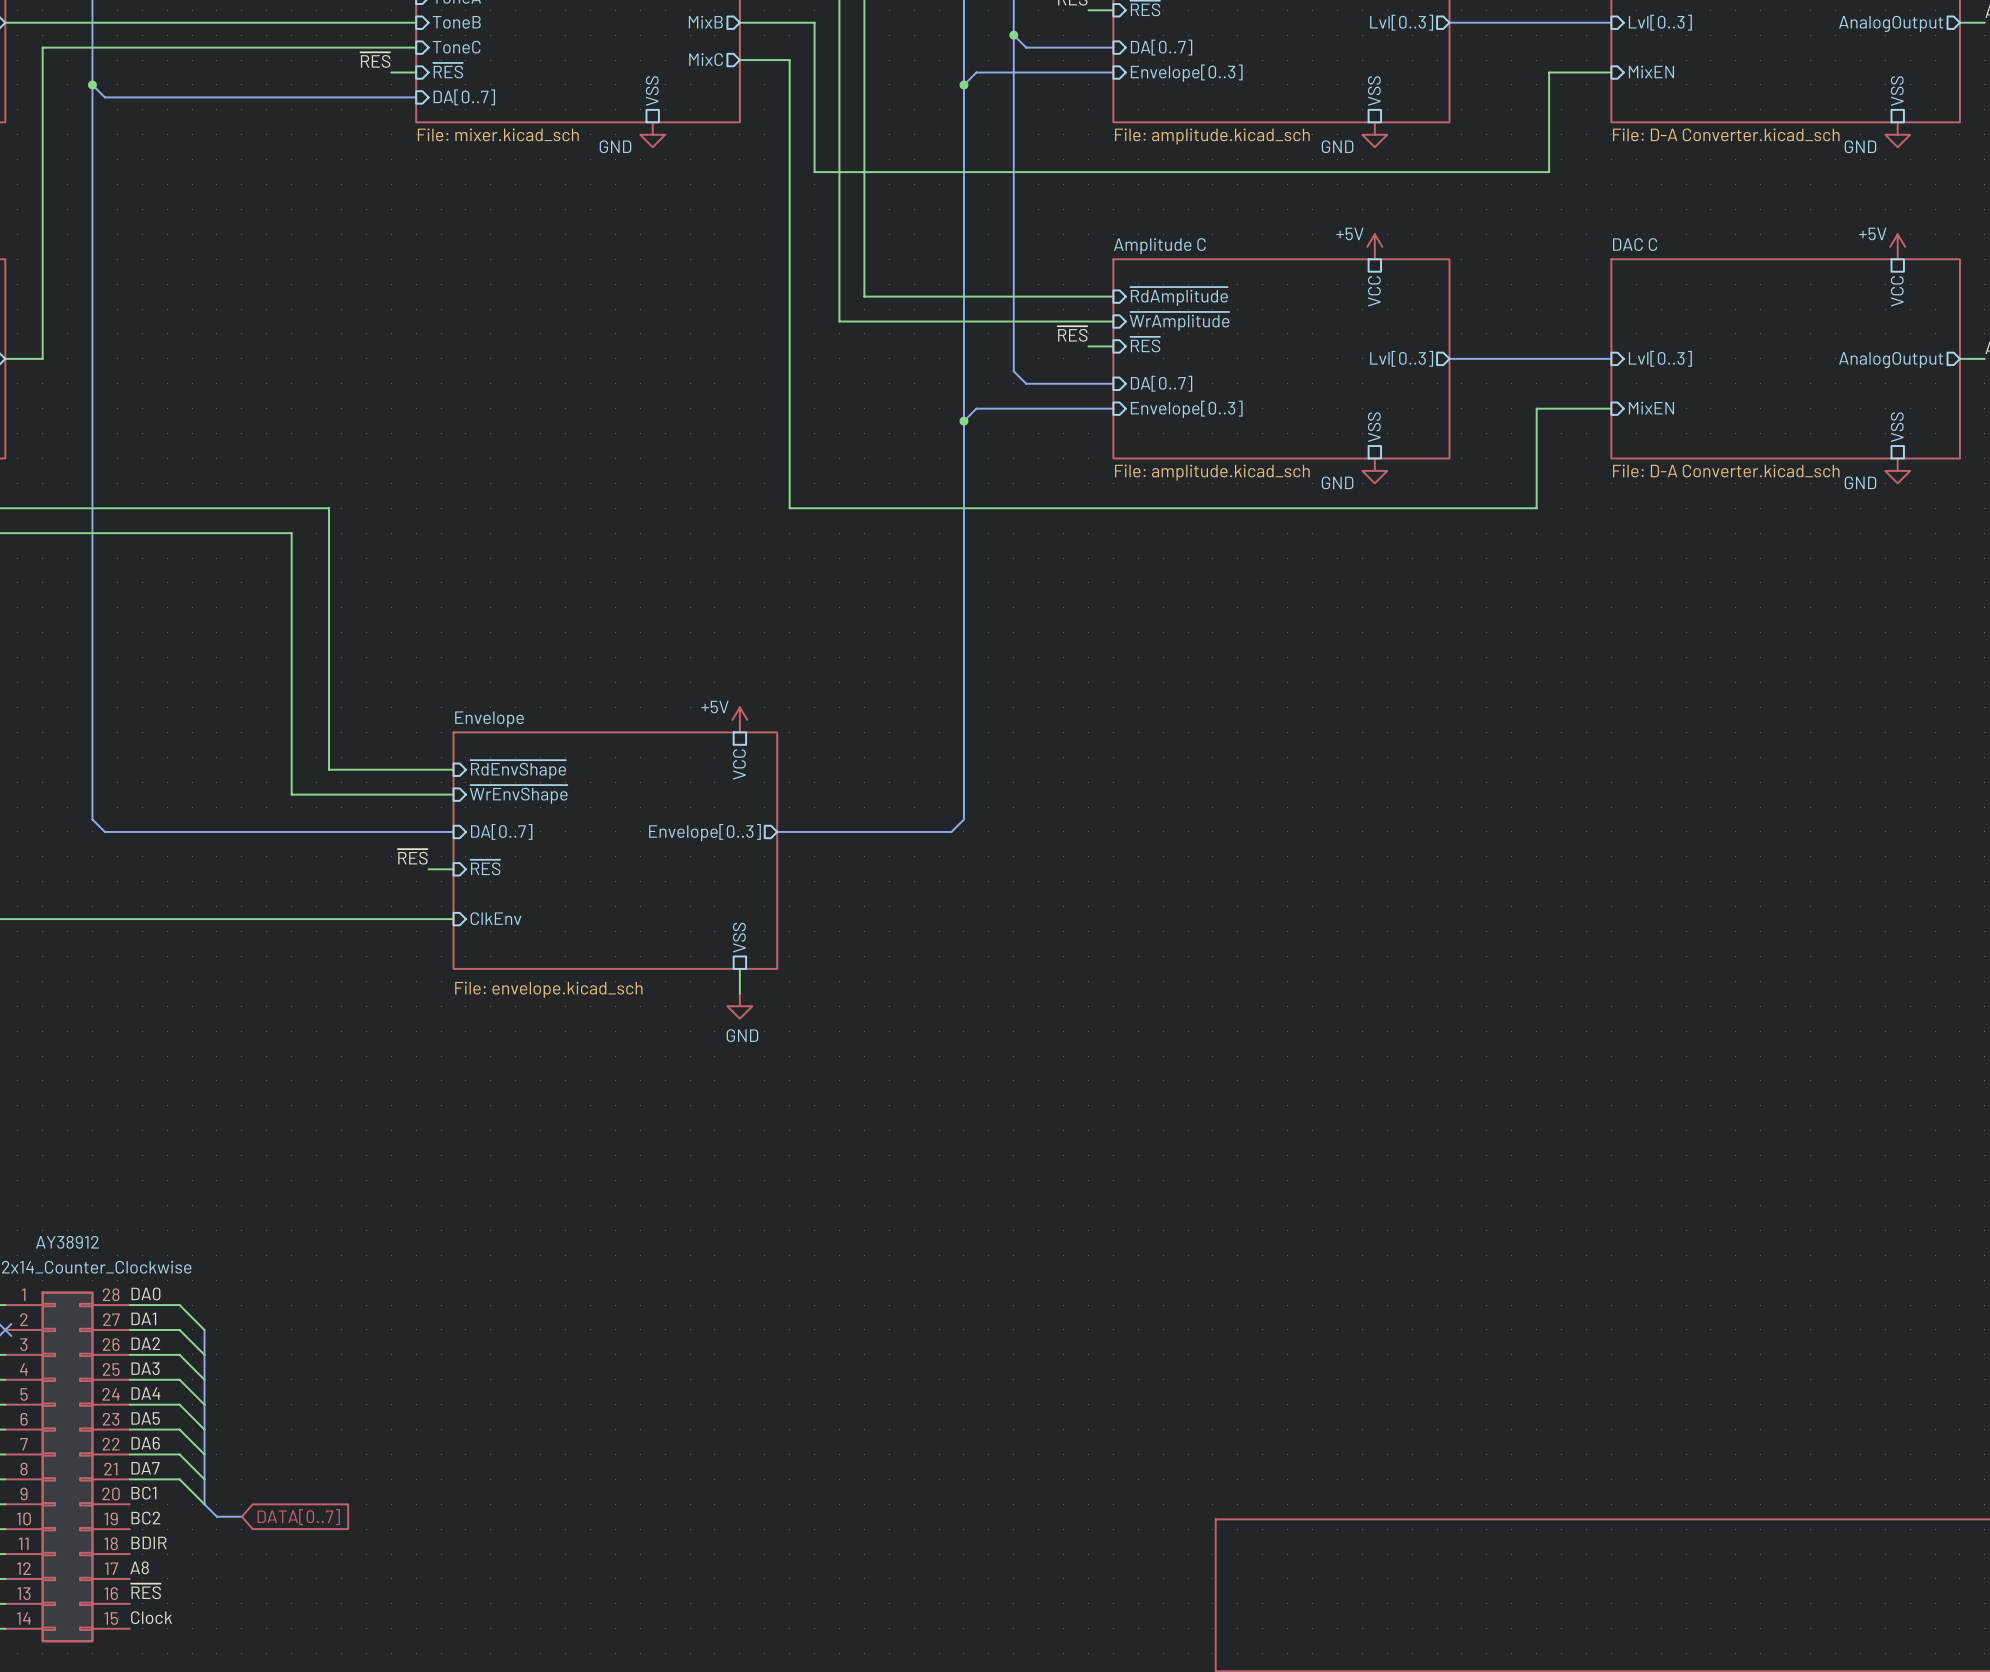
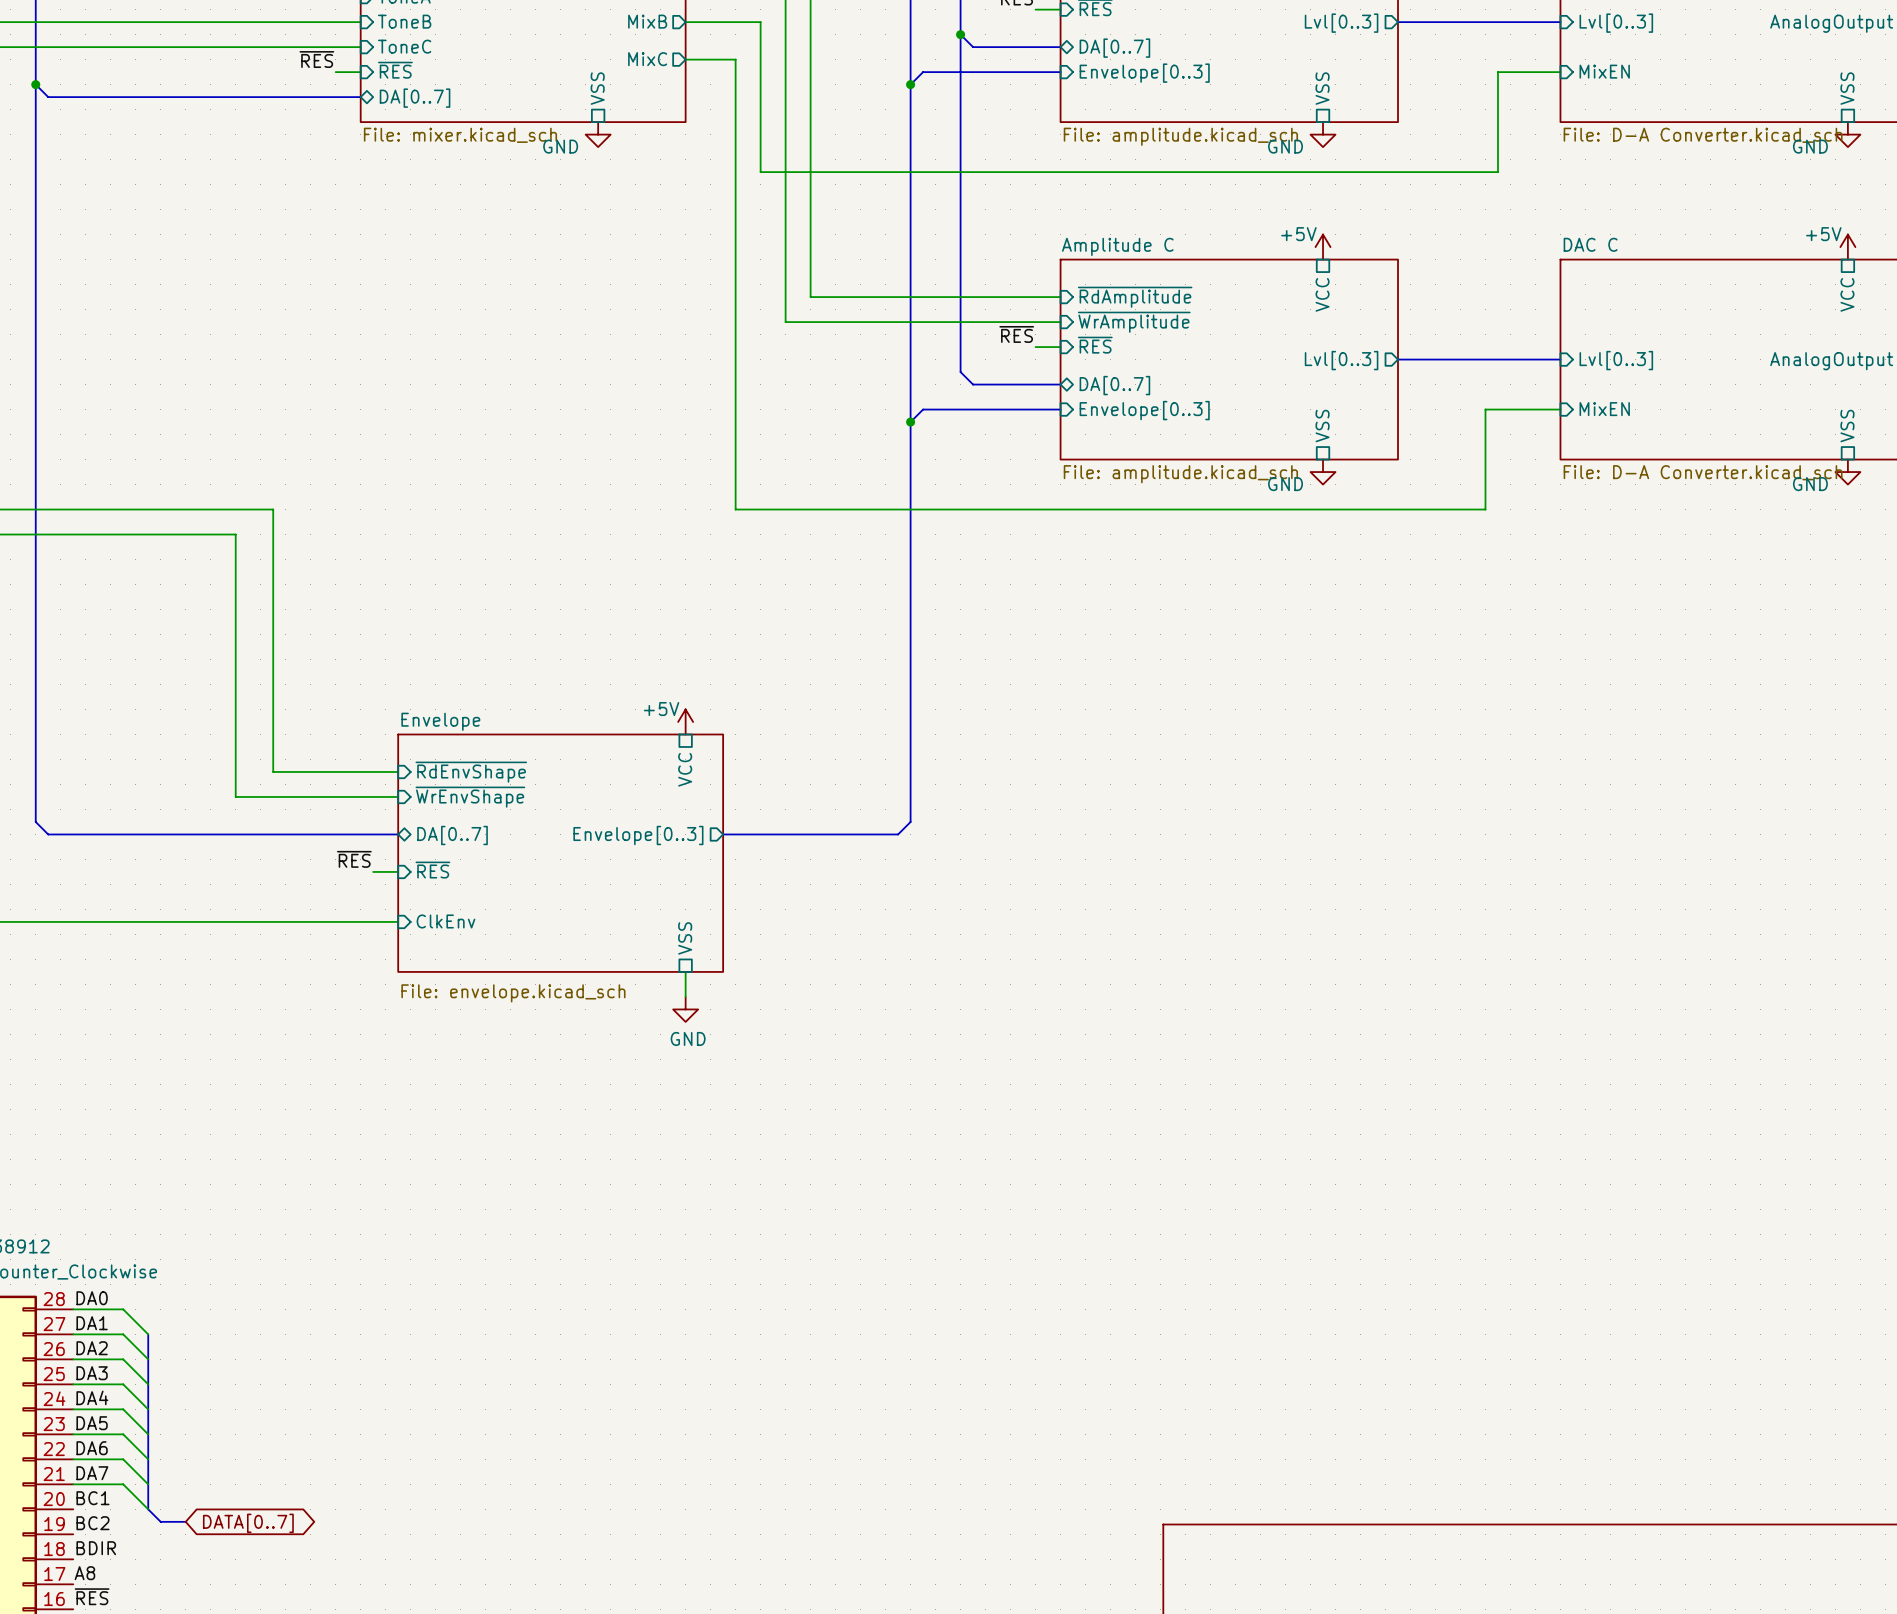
sheet pin shape: input (1161, 47) -> bidirectional (1114, 48)
sheet pin shape: input (464, 97) -> bidirectional (415, 98)
sheet pin shape: input (1161, 383) -> bidirectional (1114, 385)
sheet pin shape: input (501, 831) -> bidirectional (452, 835)
global label shape: input (298, 1517) -> bidirectional (248, 1523)

